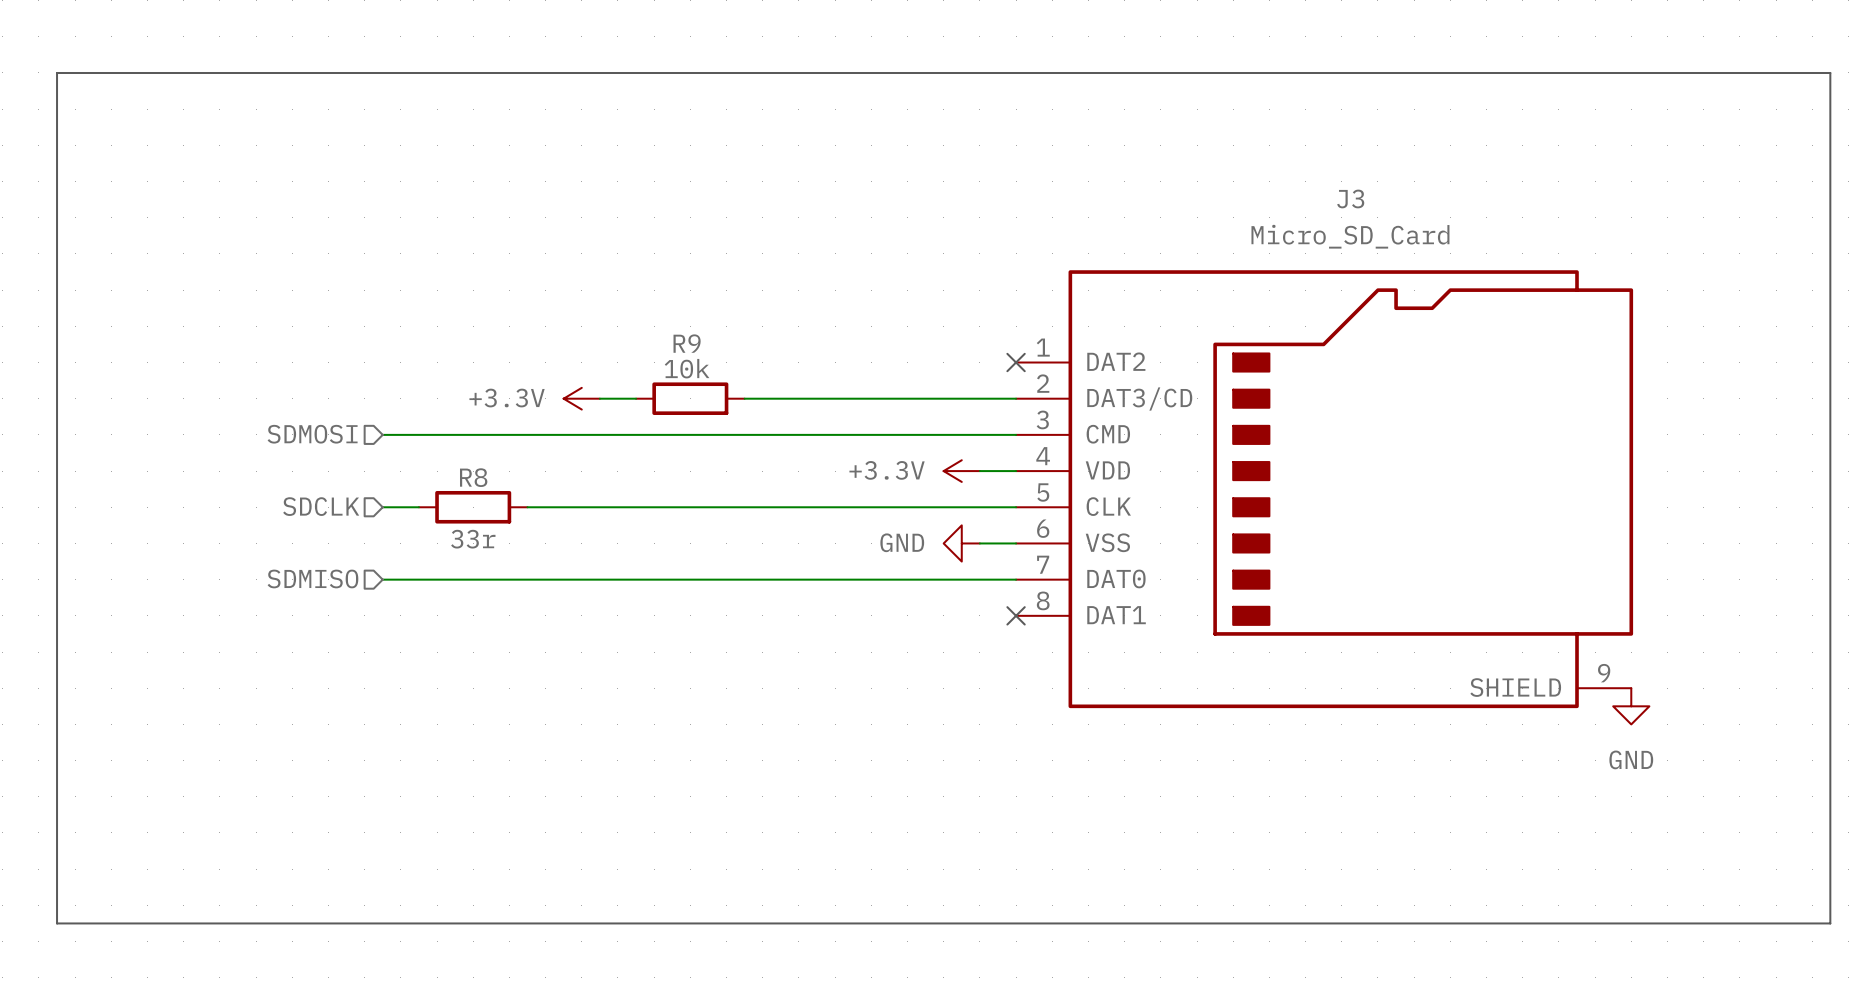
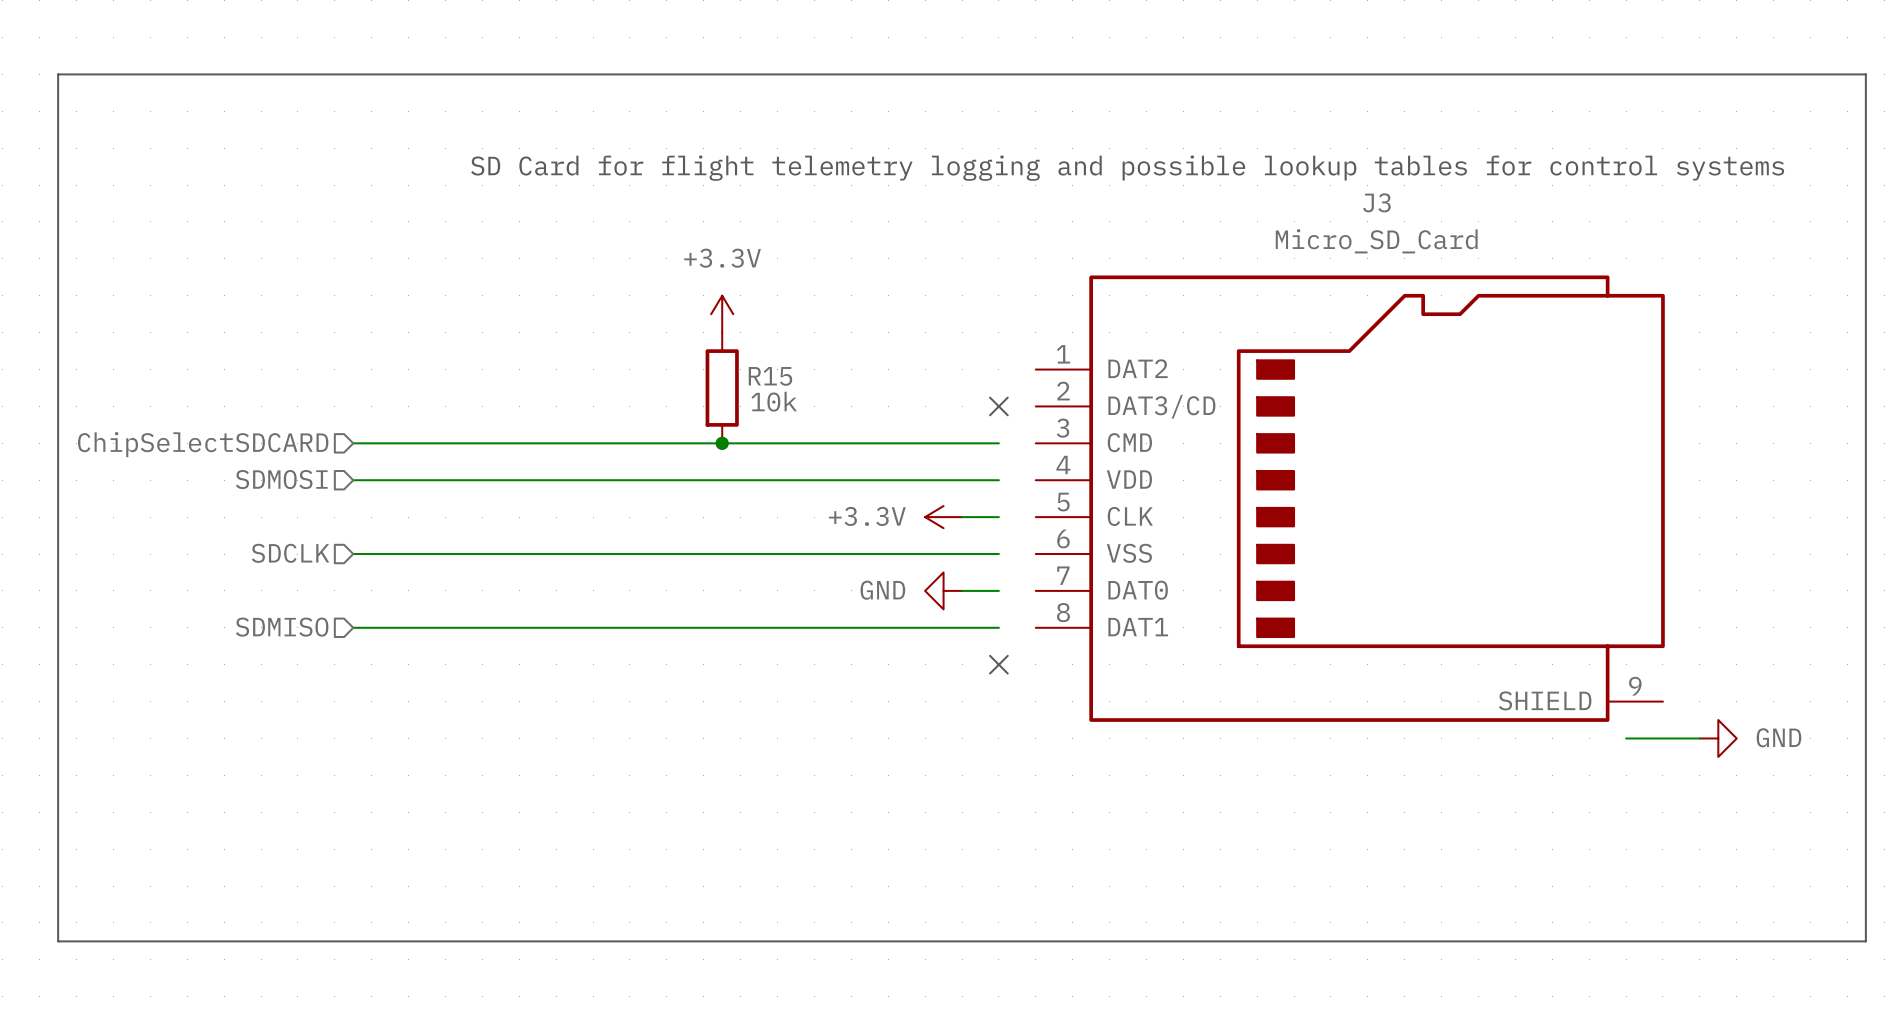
text: none -> SD Card for flight telemetry logging and possible lookup tables for control systems (1127, 168)
power symbol: none -> +3.3V (722, 314)
no-connect mark position: (1016, 362) -> (998, 406)
R15: none -> 10k (722, 388)
power symbol: +3.3V (581, 398) -> none
wire: (599, 398) (636, 398) -> none
R9: 10k (690, 398) -> none
wire: (744, 398) (1016, 398) -> none
hierarchical label position: SDMOSI (312, 434) -> SDMOSI (281, 479)
junction: none -> (722, 443)
wire: (979, 434) (1016, 434) -> none
hierarchical label: none -> ChipSelectSDCARD (203, 444)
power symbol position: +3.3V (961, 471) -> +3.3V (943, 517)
wire: (979, 471) (1016, 471) -> (998, 480) (353, 480)
hierarchical label position: SDCLK (321, 506) -> SDCLK (290, 553)
wire: (382, 507) (418, 507) -> (353, 443) (390, 443)
R8: 33r (473, 507) -> none
wire: (527, 507) (943, 507) -> none
wire: (979, 507) (1016, 507) -> none
power symbol position: GND (961, 543) -> GND (943, 590)
wire: (979, 543) (1016, 543) -> (998, 554) (353, 554)
hierarchical label position: SDMISO (312, 578) -> SDMISO (282, 627)
wire: (382, 579) (943, 579) -> none
wire: (979, 579) (1016, 579) -> none
wire: none -> (353, 627) (998, 627)
no-connect mark position: (1016, 615) -> (998, 664)
power symbol rotation: 0° (1631, 706) -> 90° counterclockwise (1718, 738)
power symbol position: GND (1631, 706) -> GND (1718, 738)
wire: none -> (1626, 738) (1699, 738)

